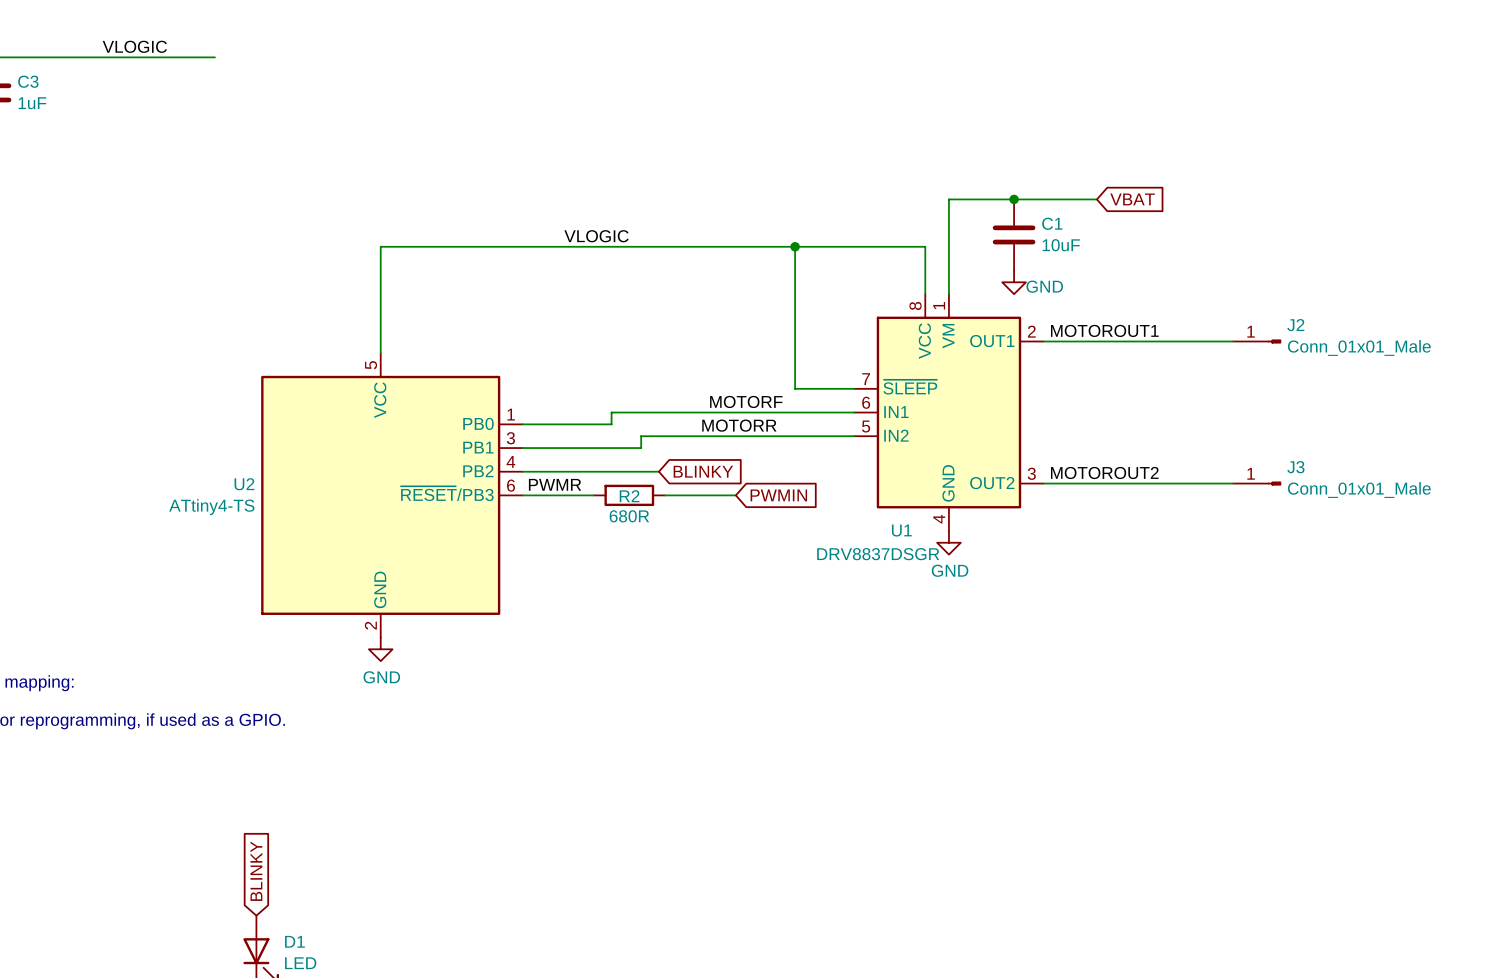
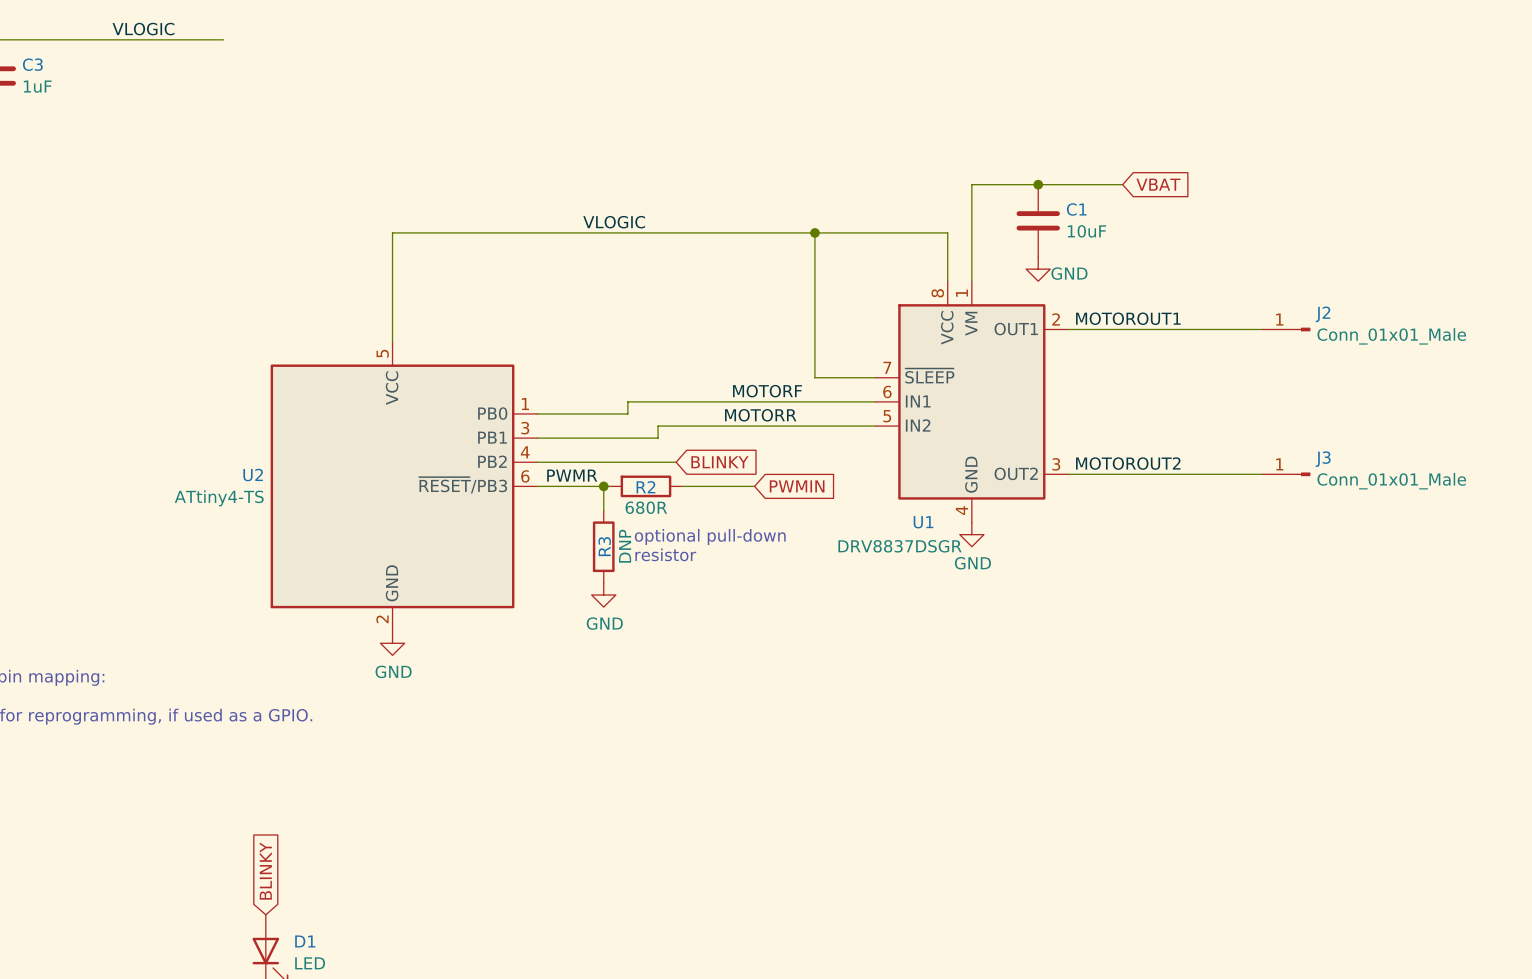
wire: none -> (603, 486) (603, 510)
junction: none -> (603, 486)
text: none -> optional pull-down (710, 536)
R3: none -> DNP (603, 546)
text: none -> resistor (665, 554)
power symbol: none -> GND (603, 595)

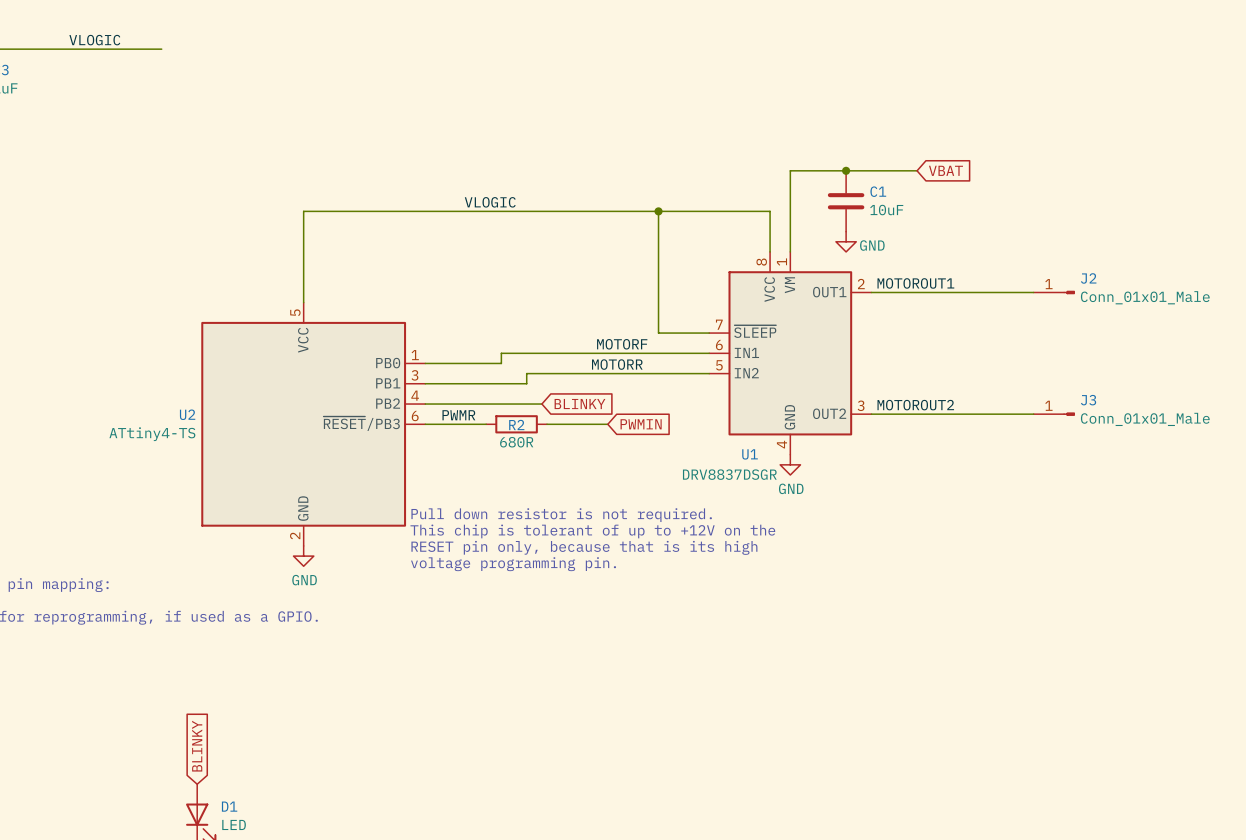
wire: (603, 486) (603, 510) -> none
junction: (603, 486) -> none
text: optional pull-down (710, 536) -> none
R3: DNP (603, 546) -> none
text: resistor (665, 554) -> none
text: none -> Pull down resistor is not required. (561, 515)
power symbol: GND (603, 595) -> none
text: none -> This chip is tolerant of up to +12V on the (592, 531)
text: none -> RESET pin only, because that is its high (584, 547)
text: none -> voltage programming pin. (513, 564)

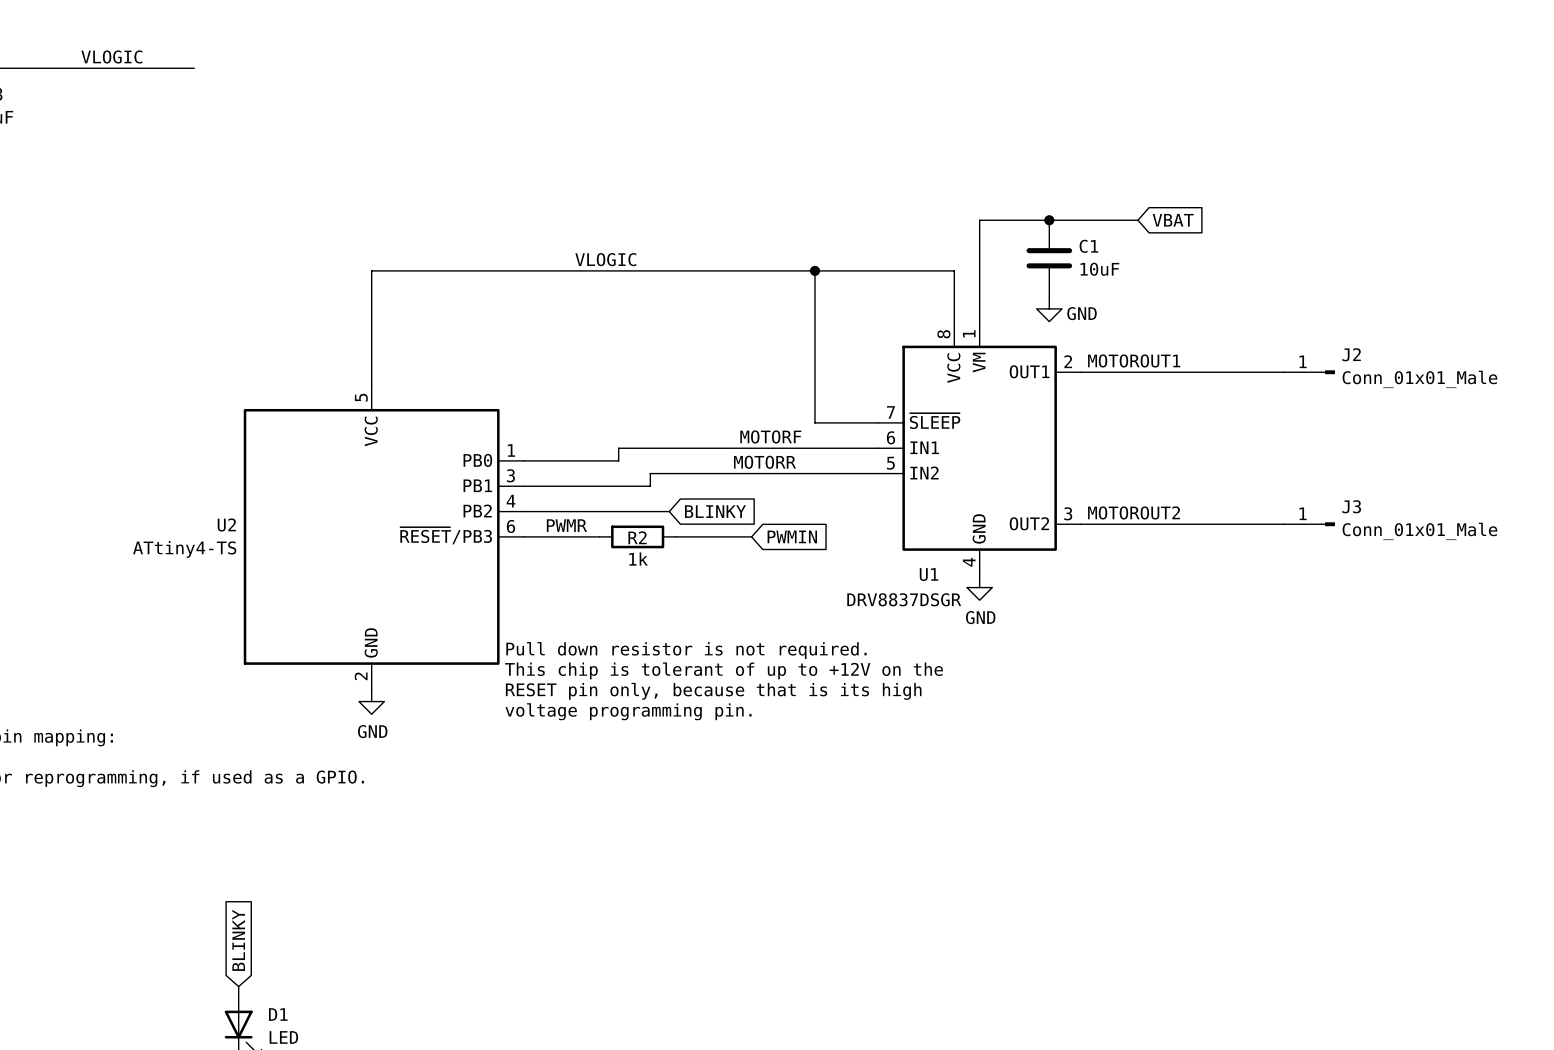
R2 value: 680R (516, 442) -> 1k (638, 559)

